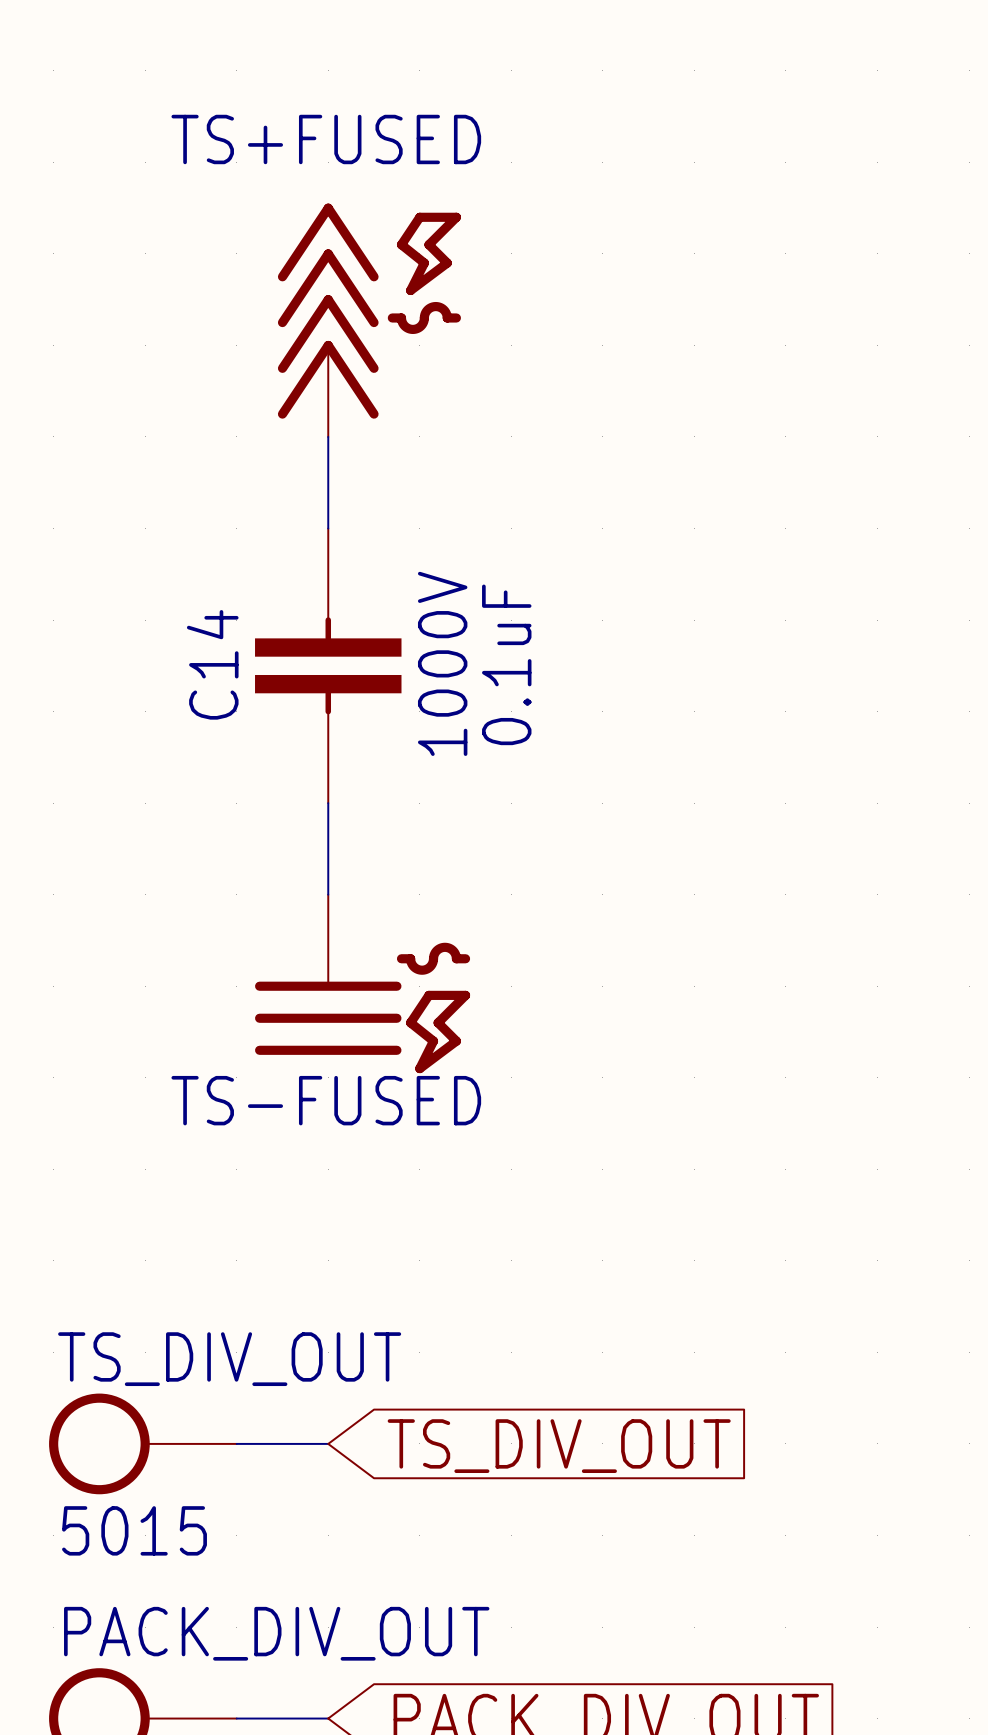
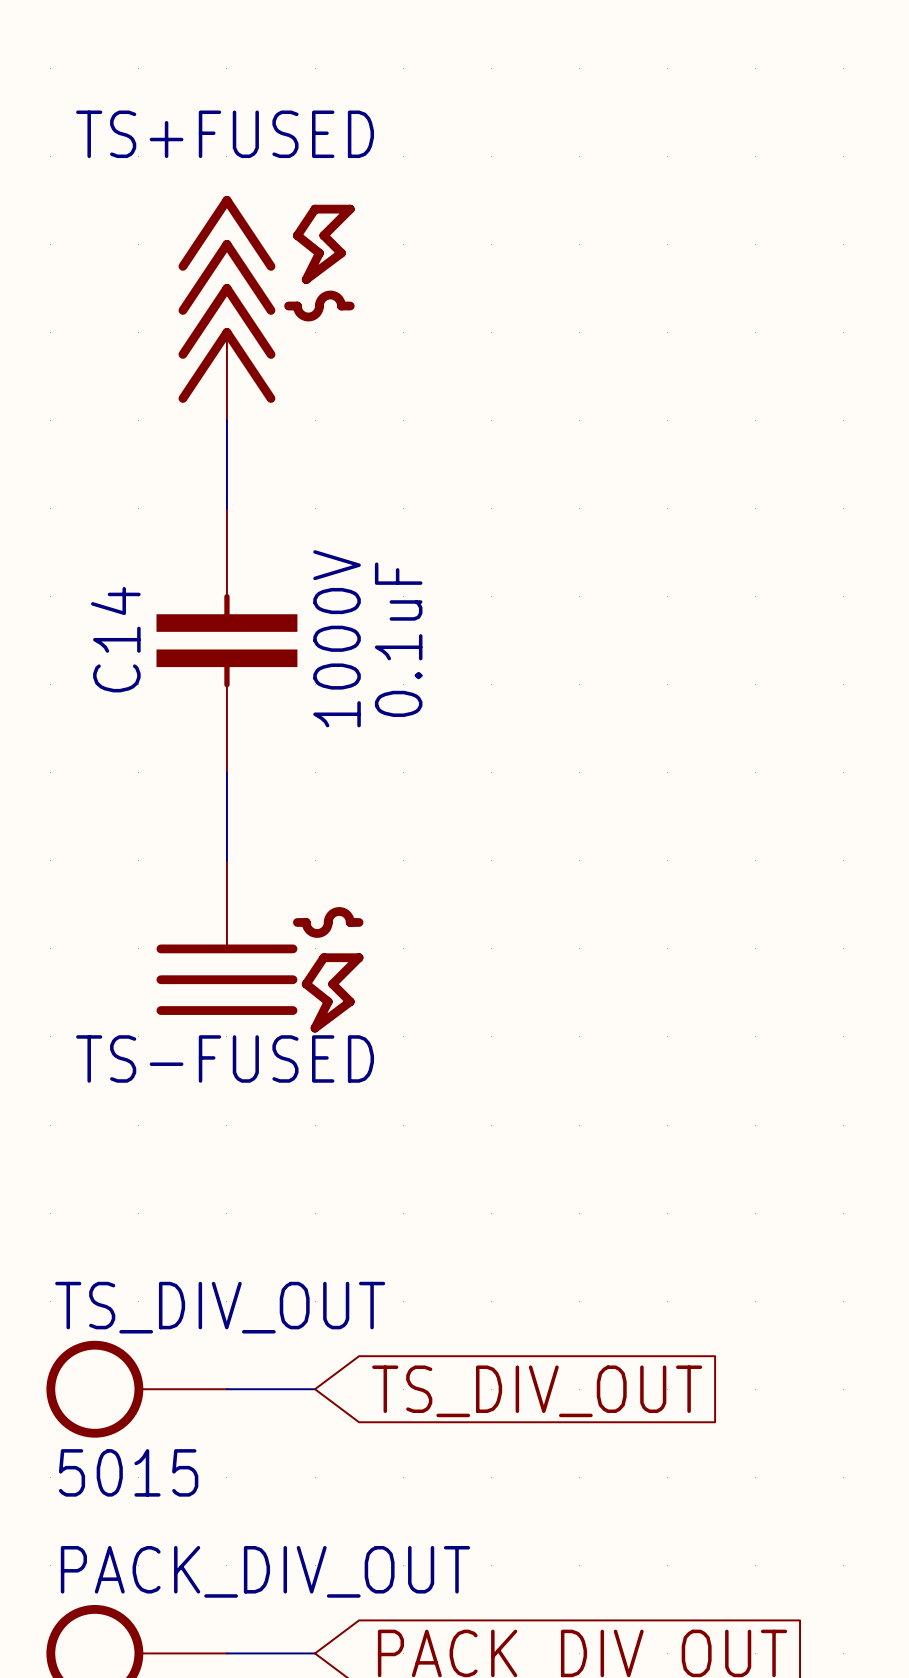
power symbol position: TS+FUSED (369, 320) -> TS+FUSED (266, 308)
wire: (328, 436) (328, 528) -> (226, 420) (226, 508)
C14 position: (328, 665) -> (226, 640)
wire: (328, 803) (328, 894) -> (226, 772) (226, 860)
power symbol position: TS-FUSED (362, 983) -> TS-FUSED (259, 946)

